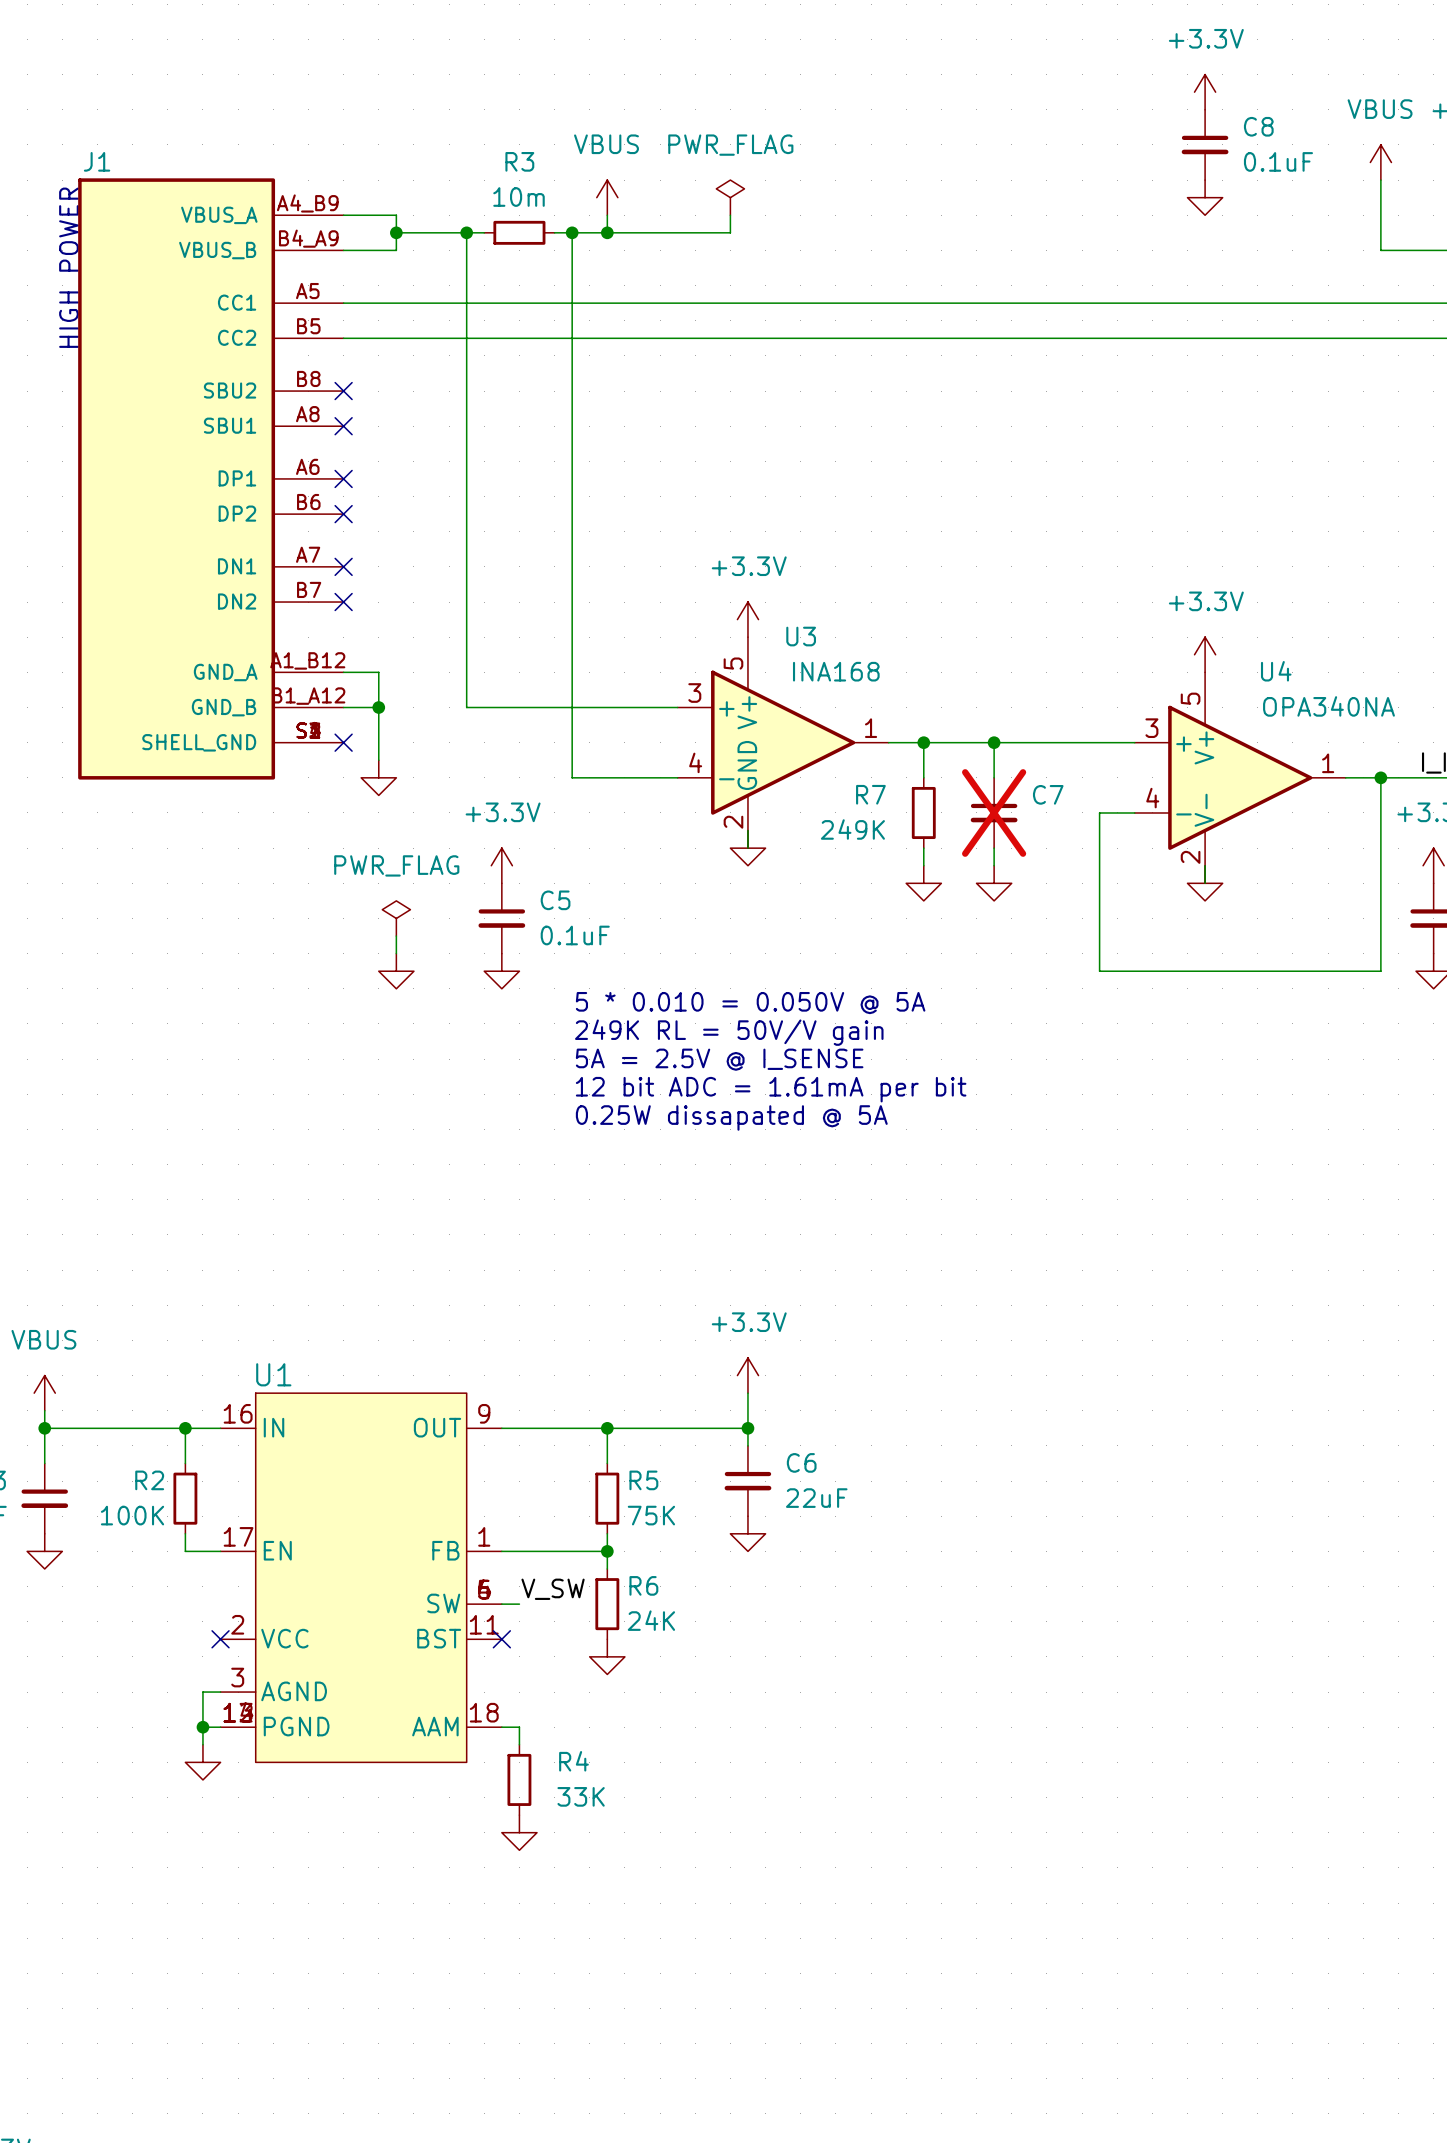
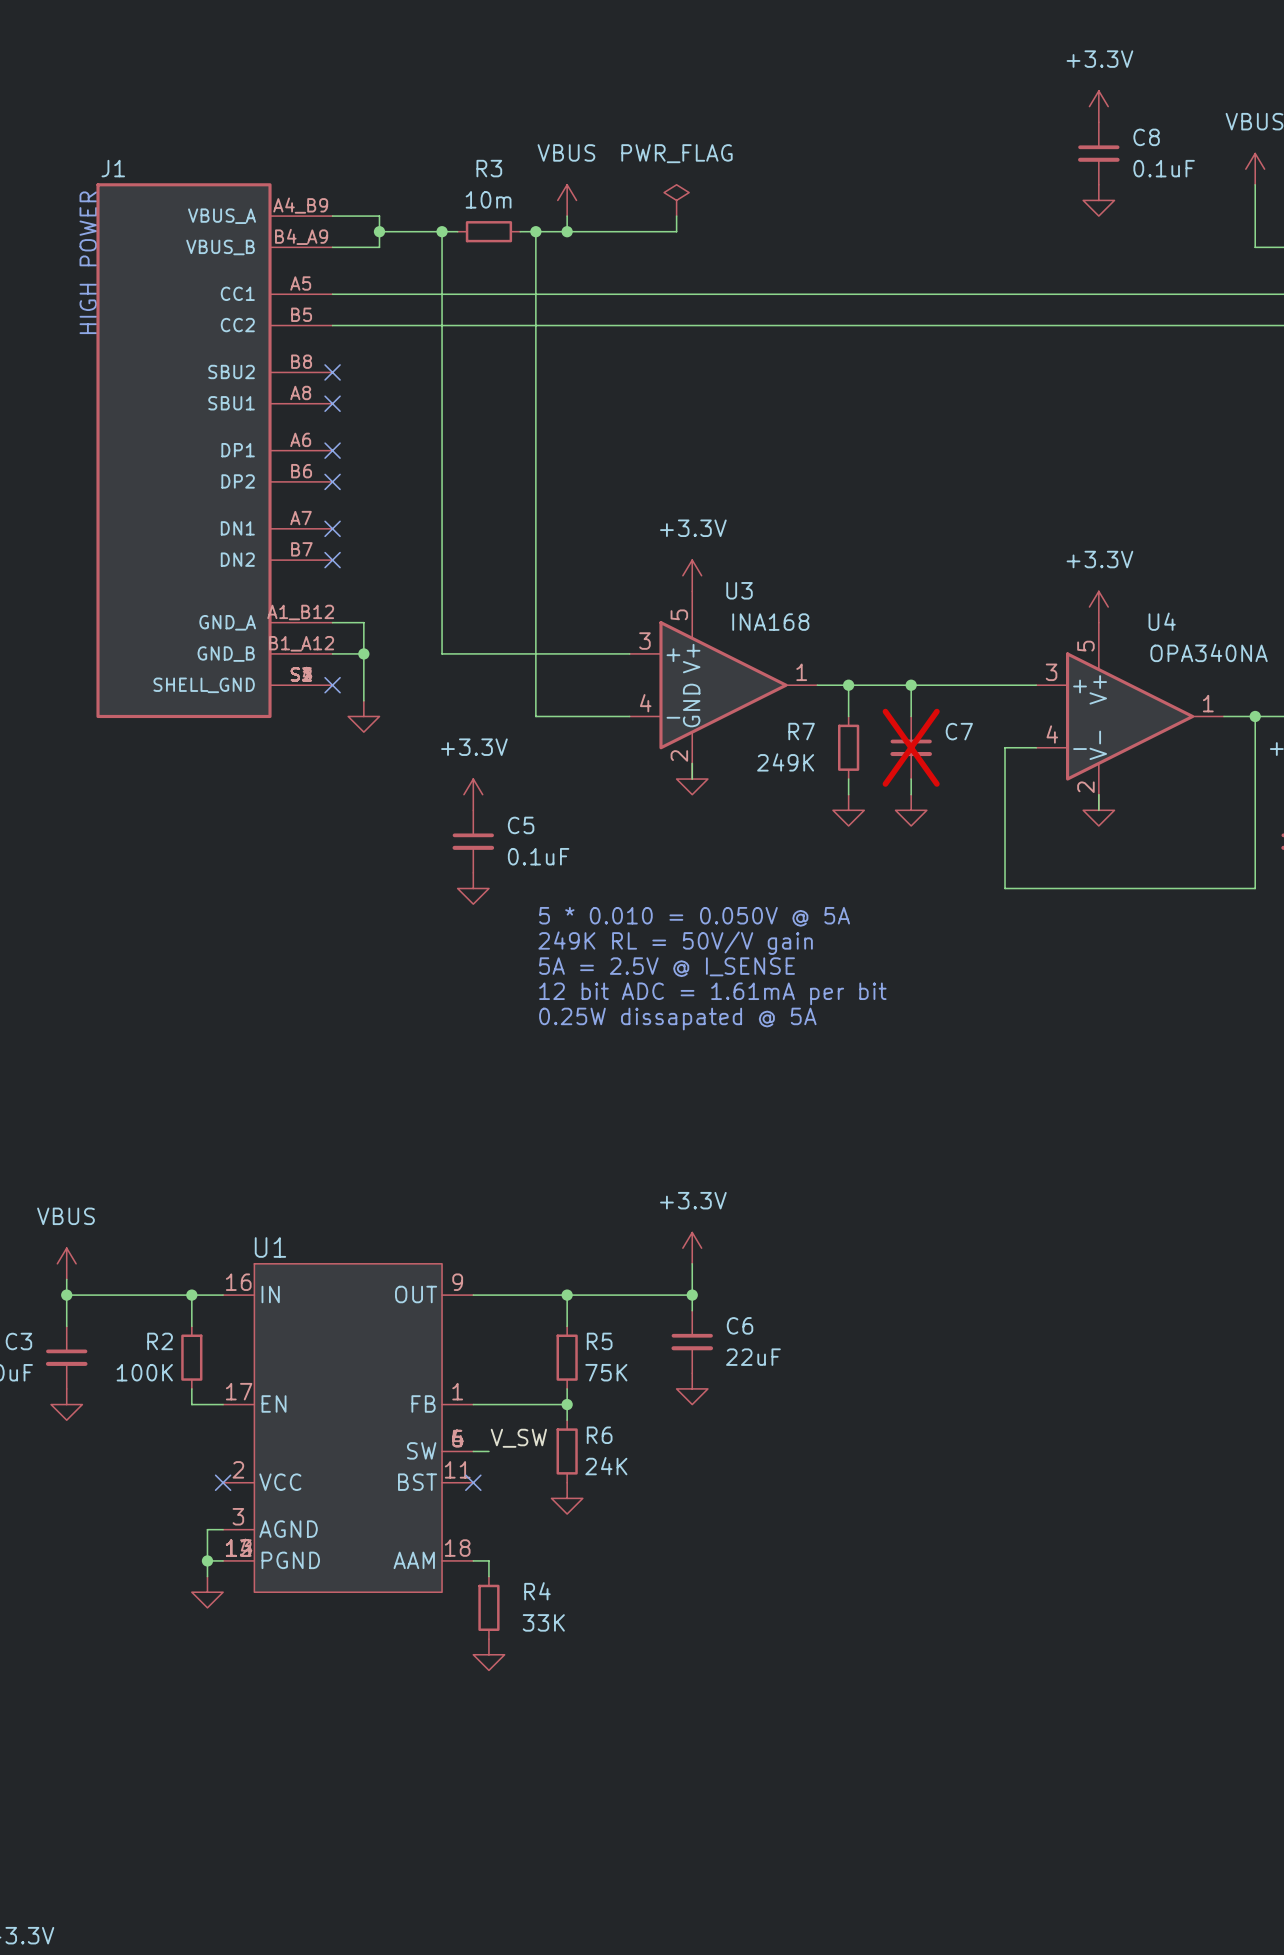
power symbol: PWR_FLAG (396, 918) -> none
wire: (396, 936) (396, 953) -> none
power symbol: (396, 971) -> none

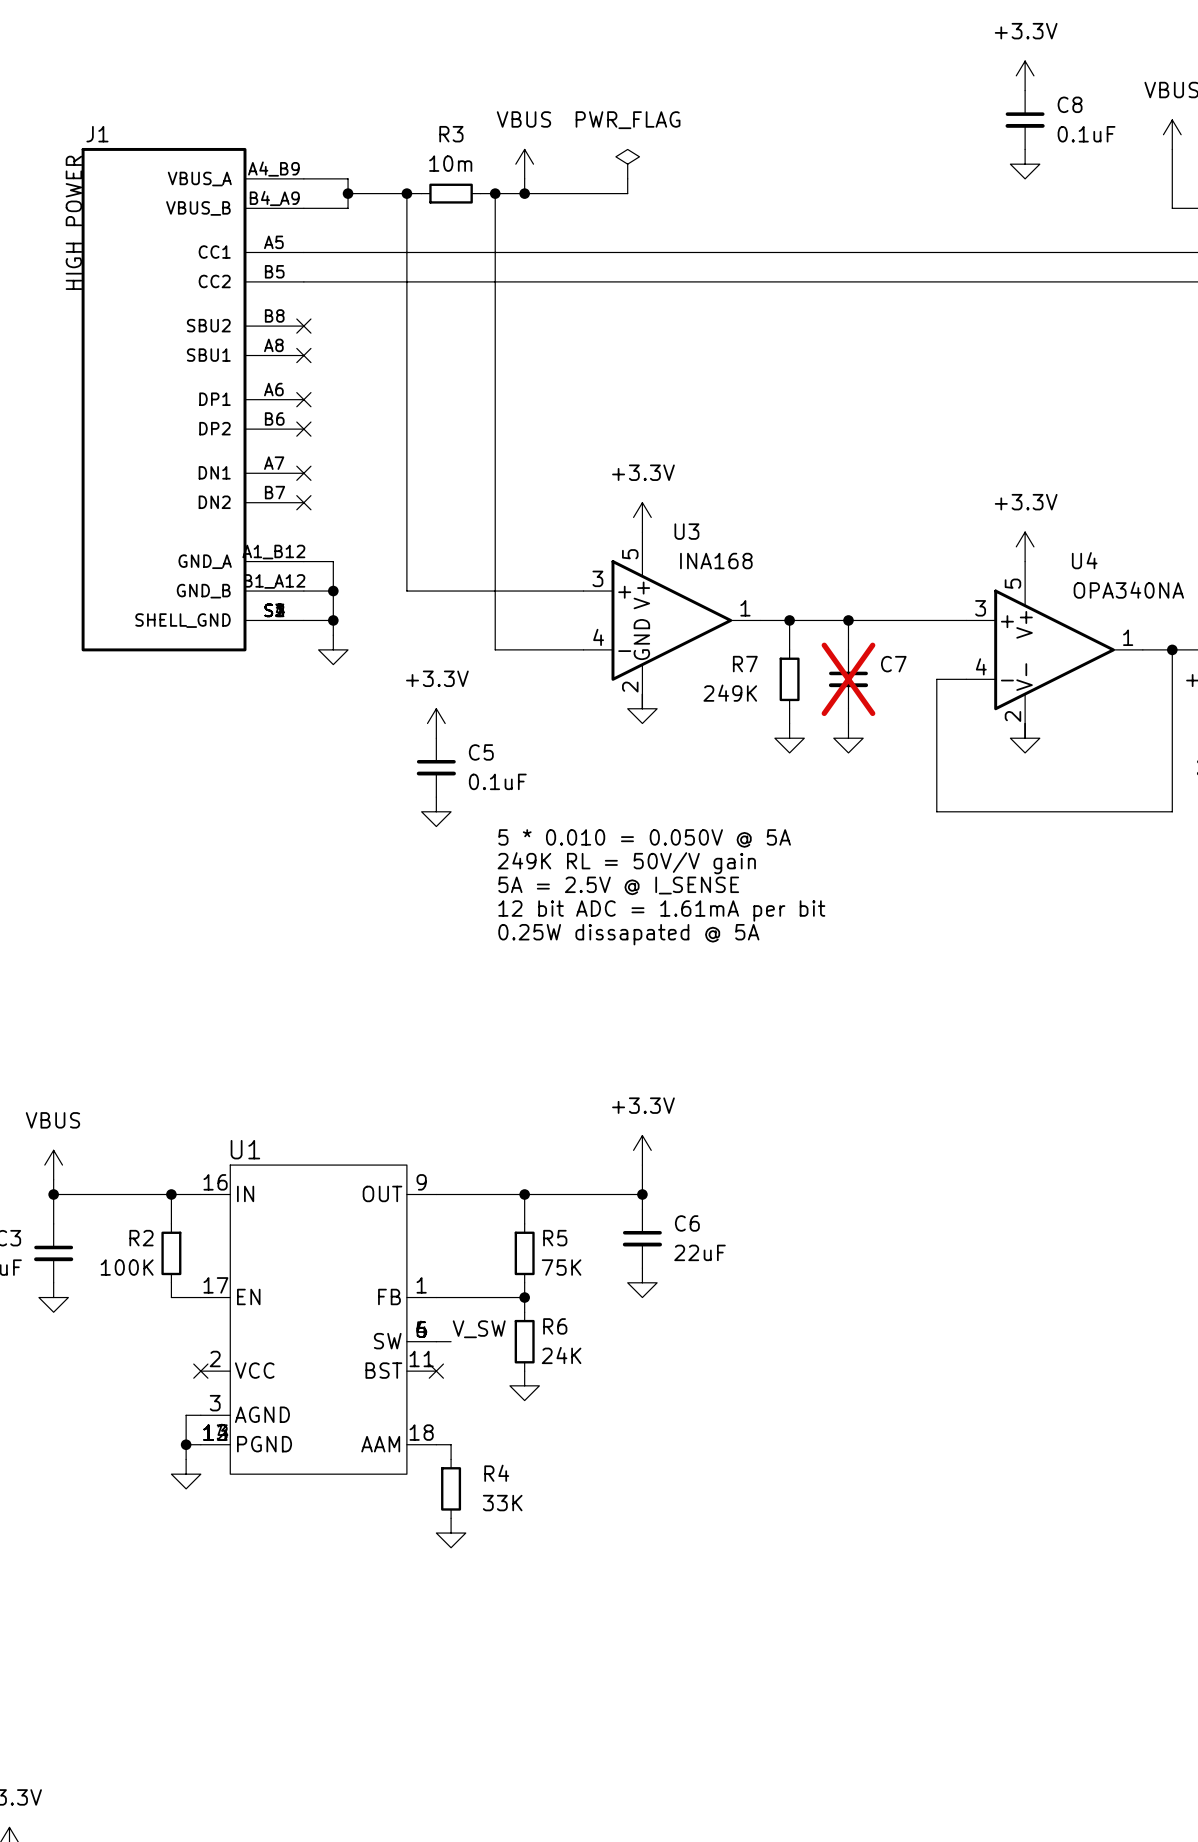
wire: none -> (303, 620) (333, 620)
no-connect mark: (332, 685) -> none
junction: none -> (333, 620)

